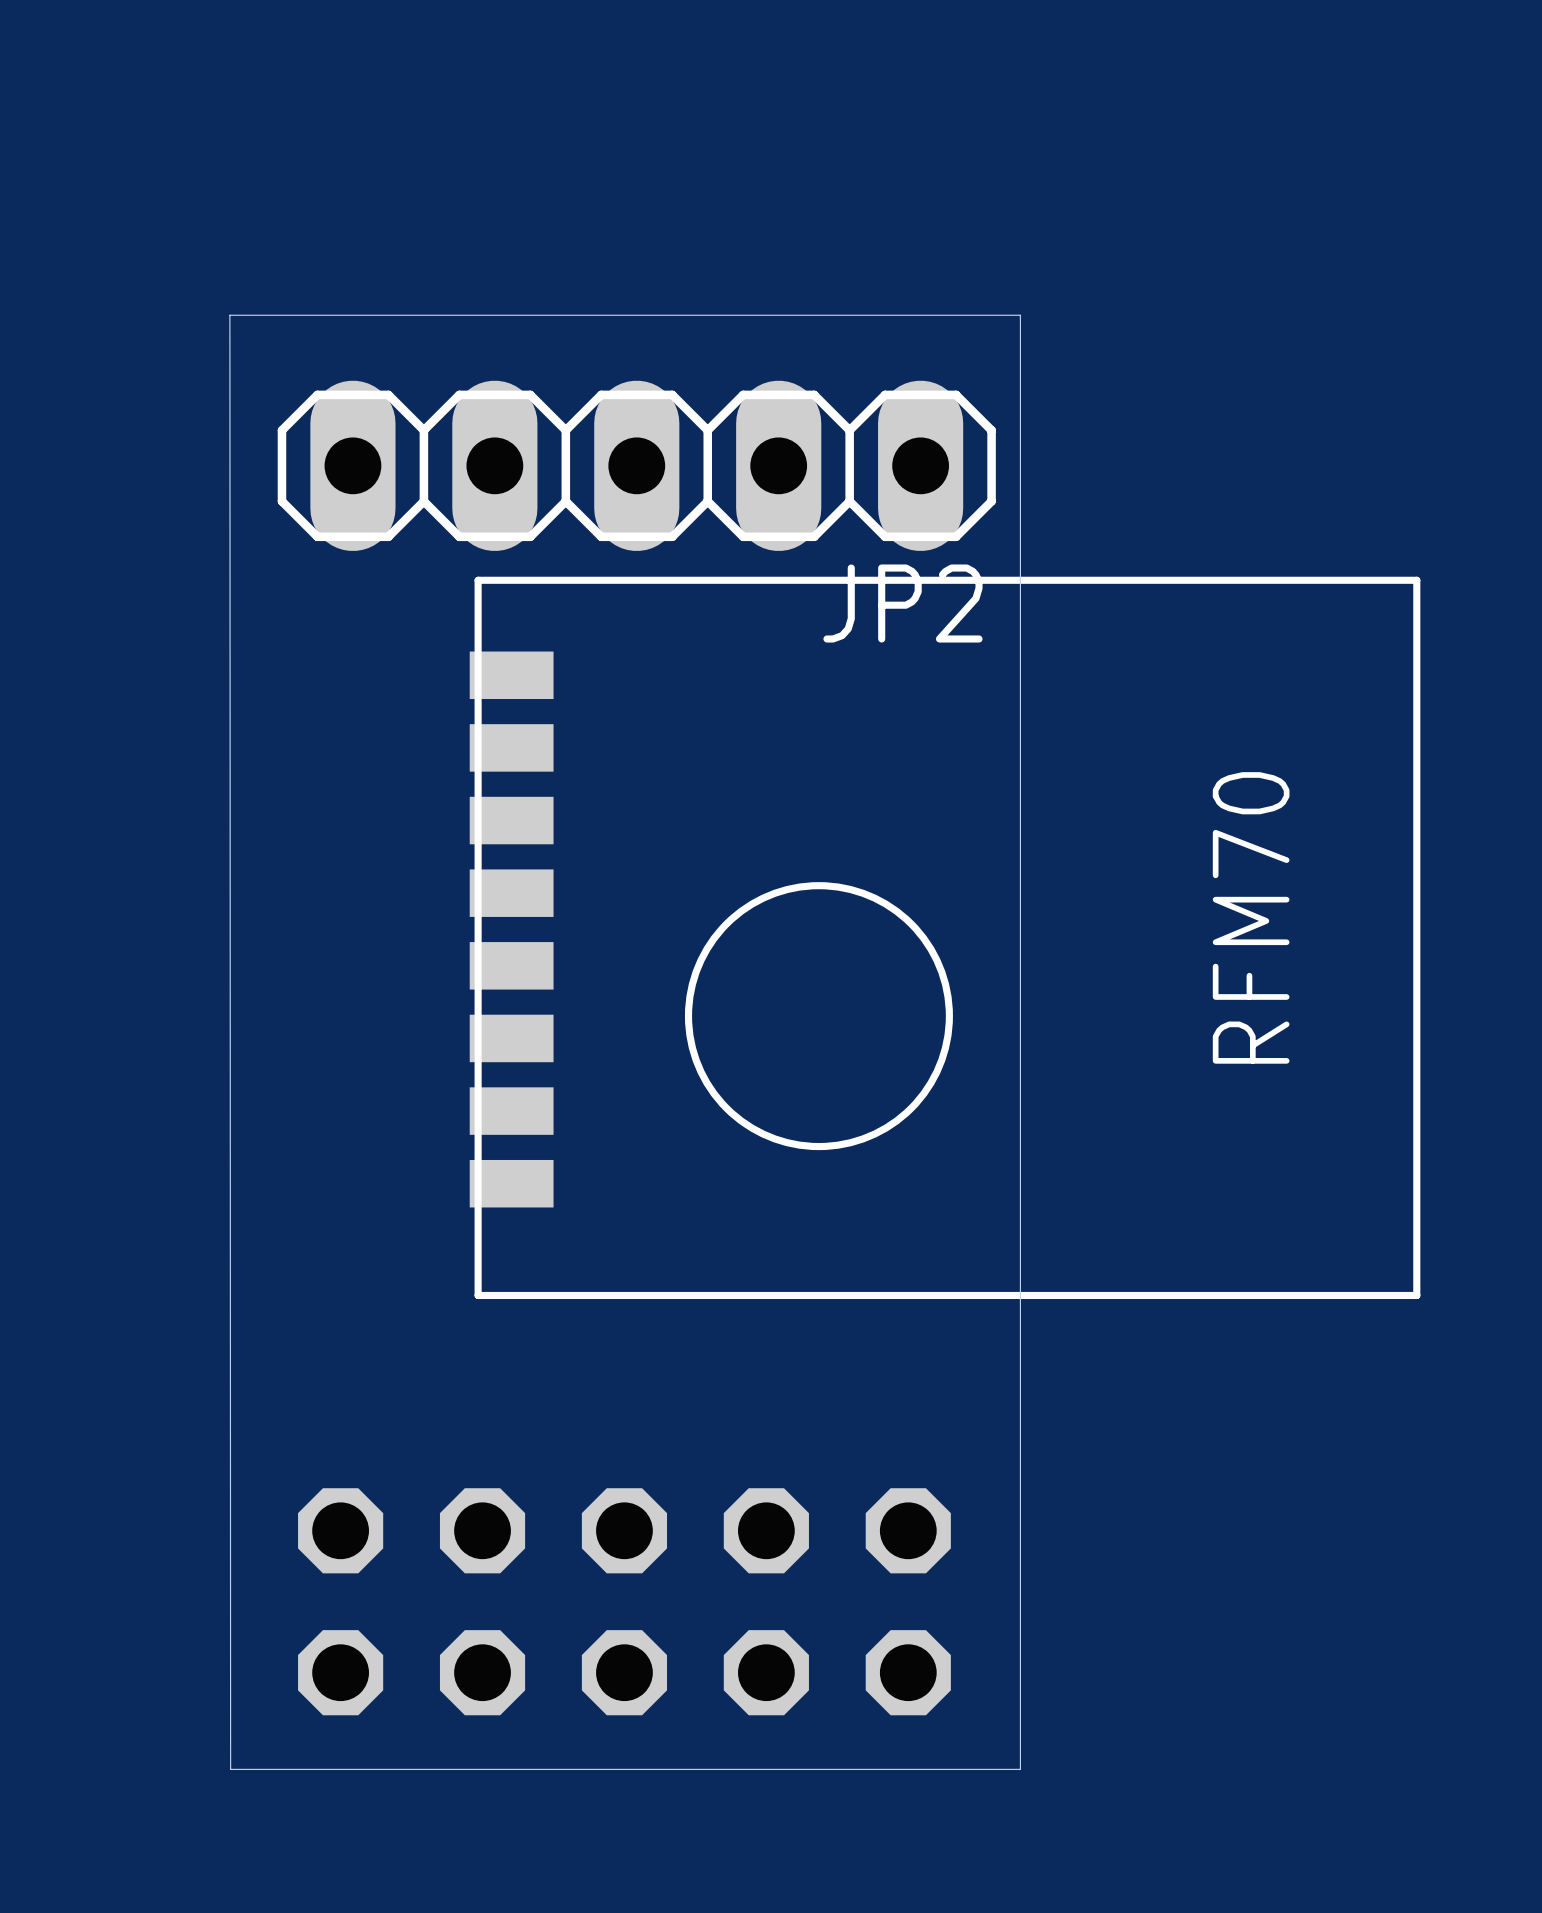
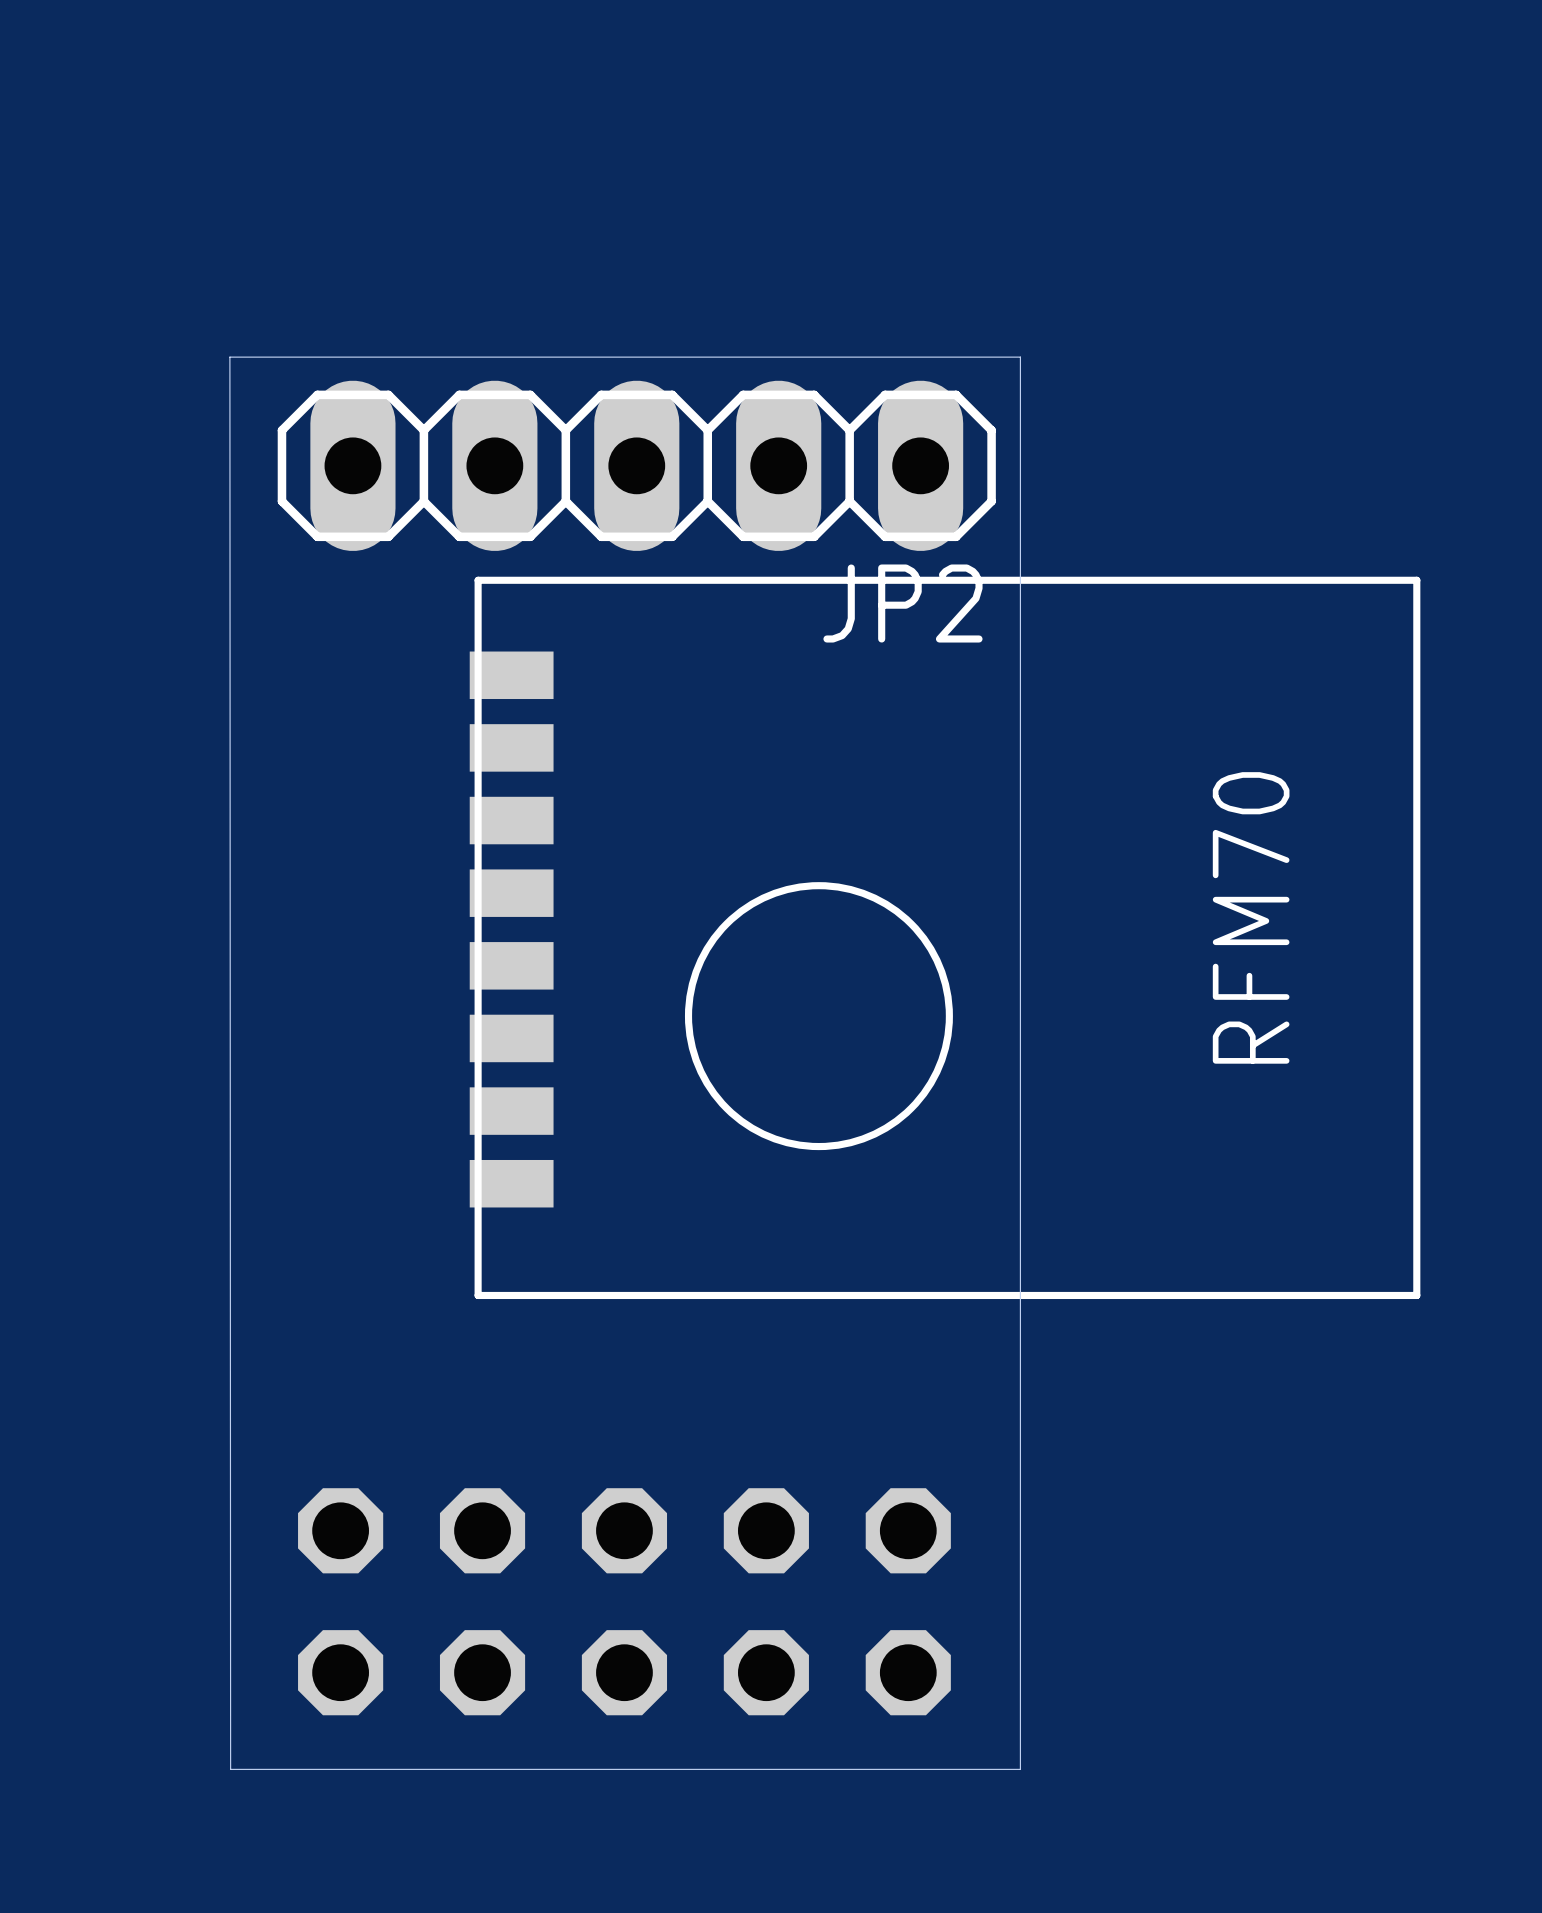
board edge: (1020, 357) (1020, 315) (229, 315) (229, 357) -> (1020, 357) (229, 357)

